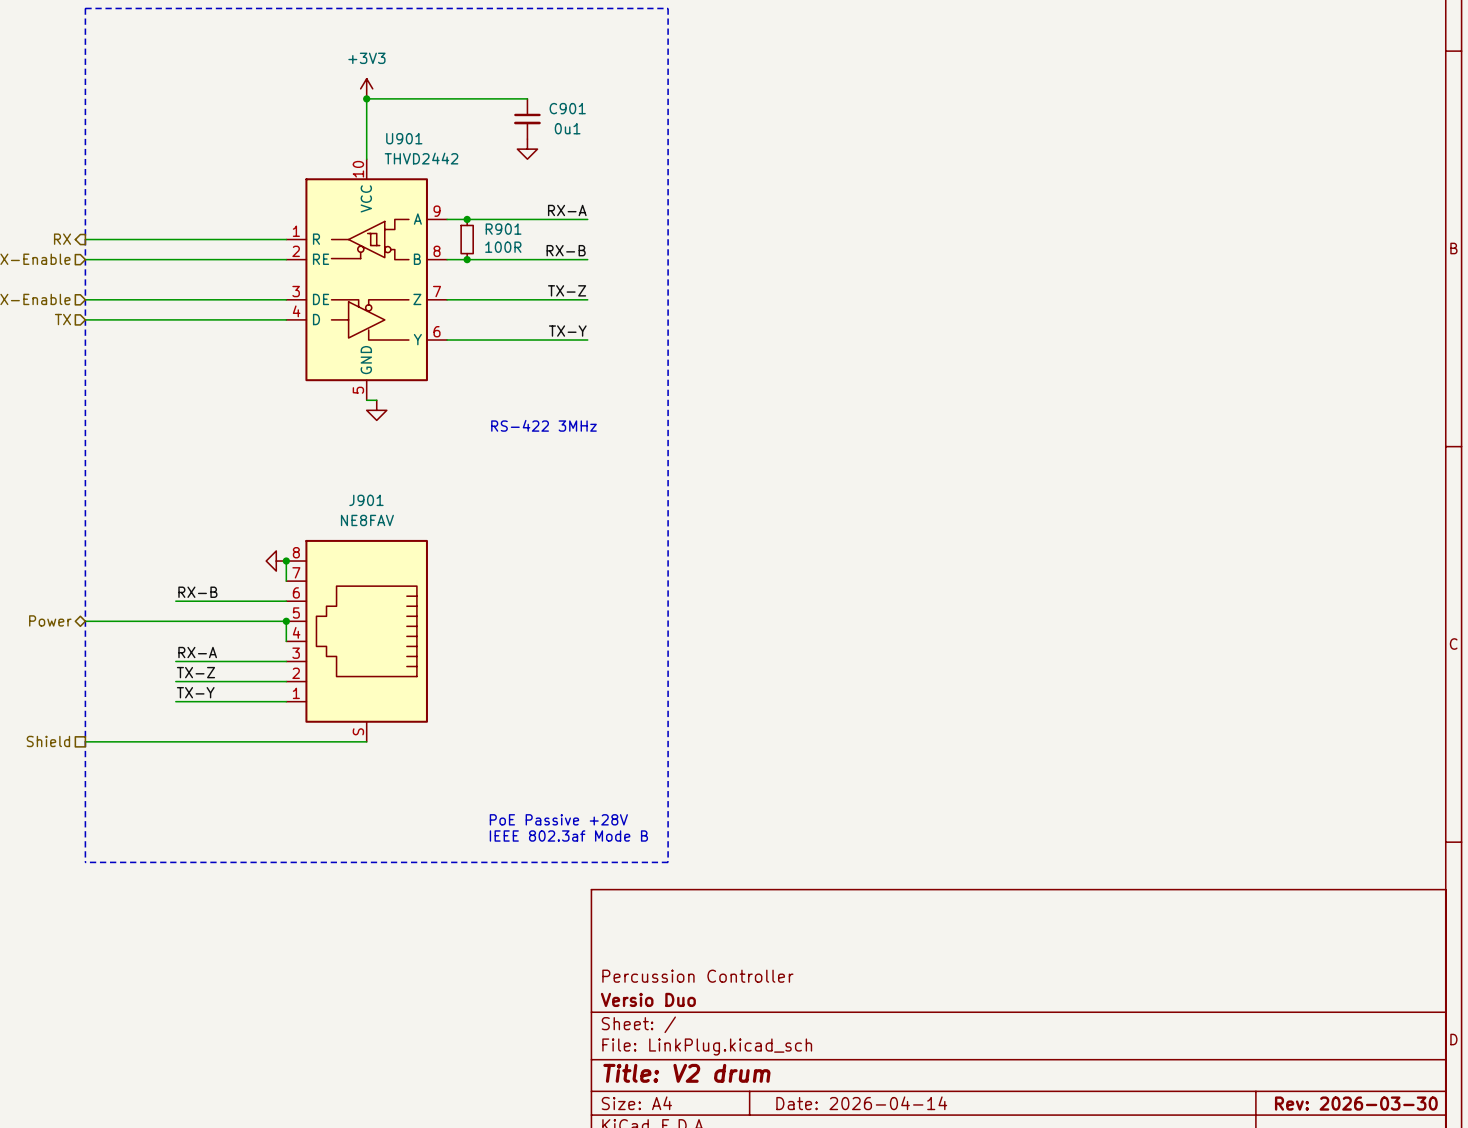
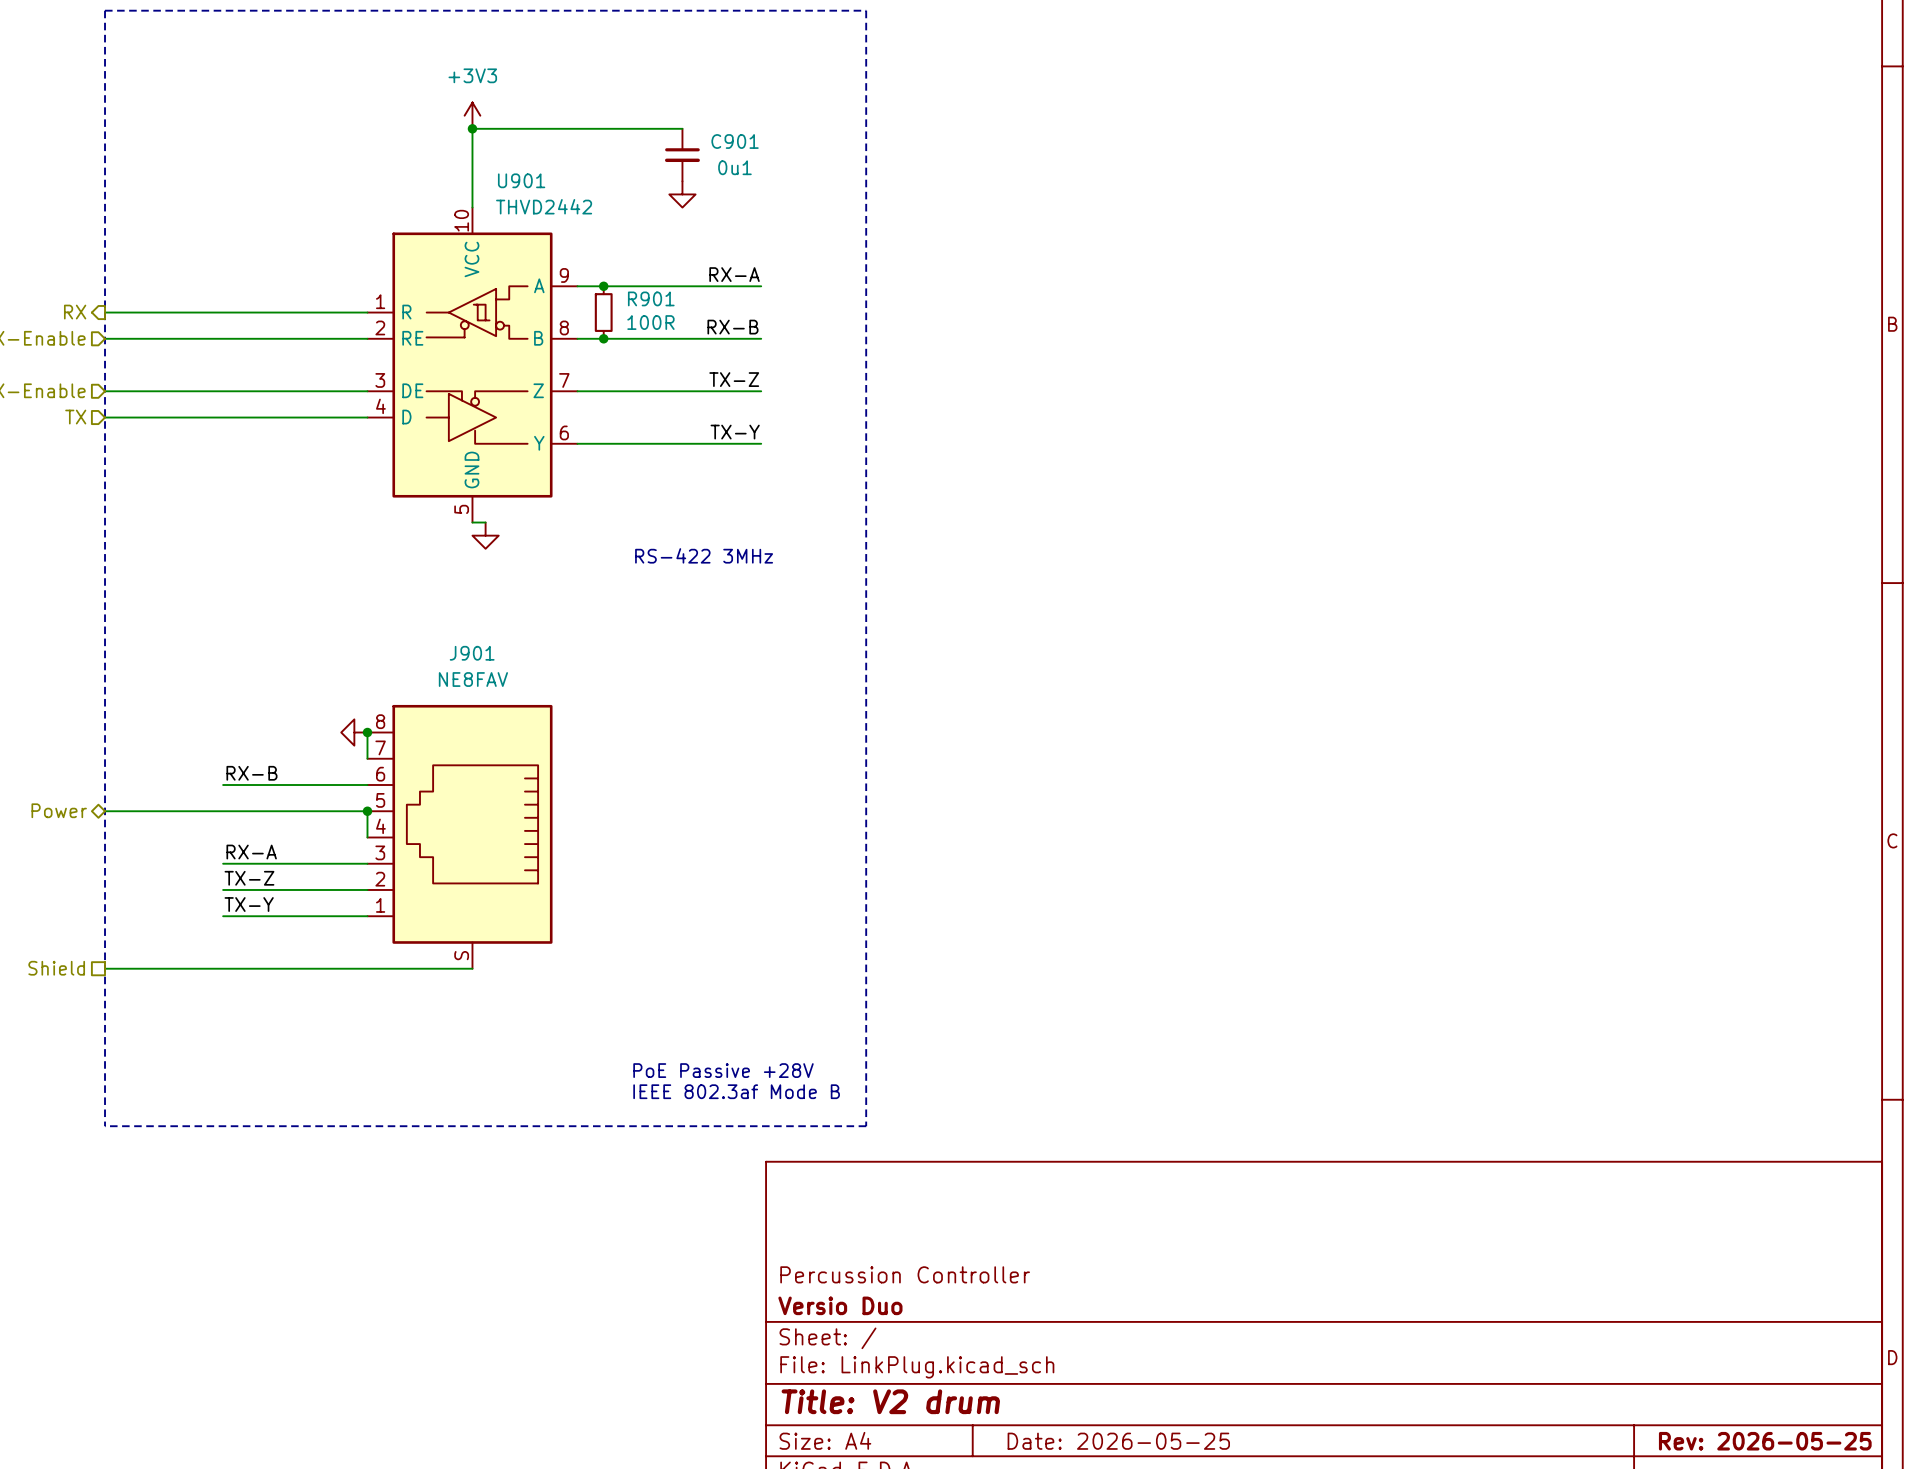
title block: Date: 2026-04-14 (861, 1103) -> Date: 2026-05-25 (1118, 1441)
title block: Rev: 2026-03-30 (1356, 1103) -> Rev: 2026-05-25 (1765, 1441)

